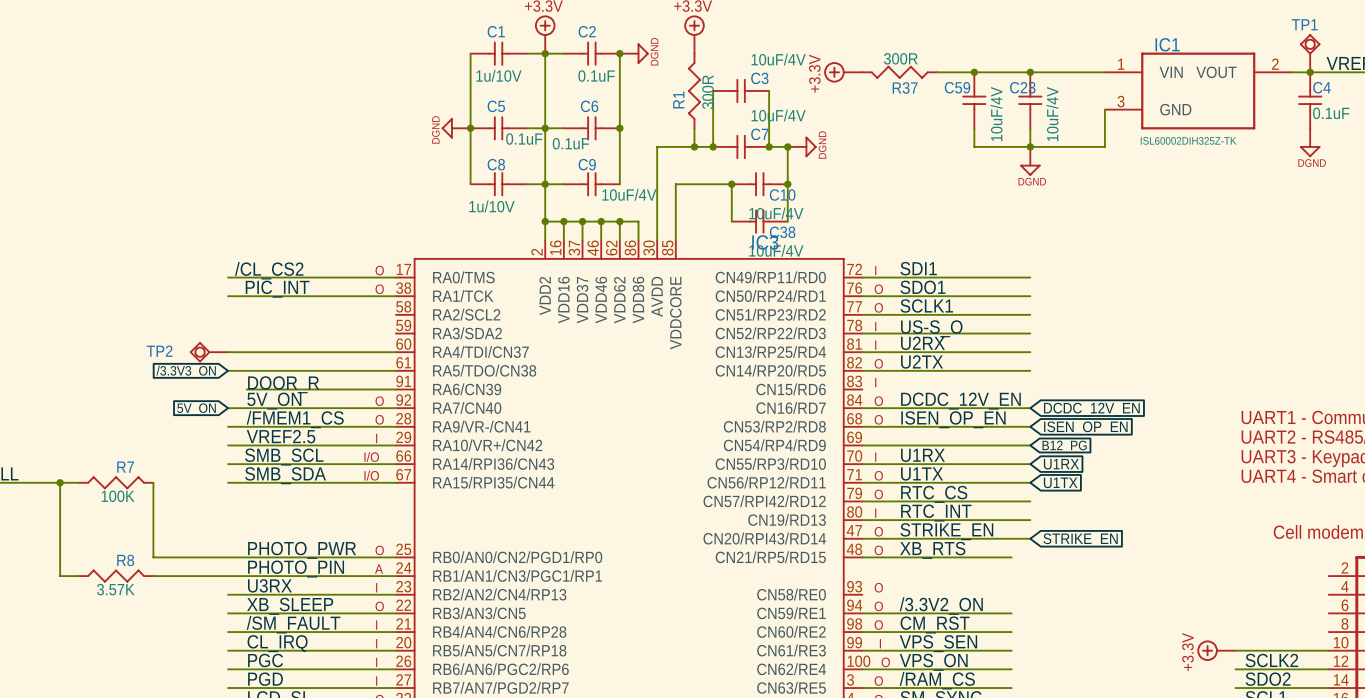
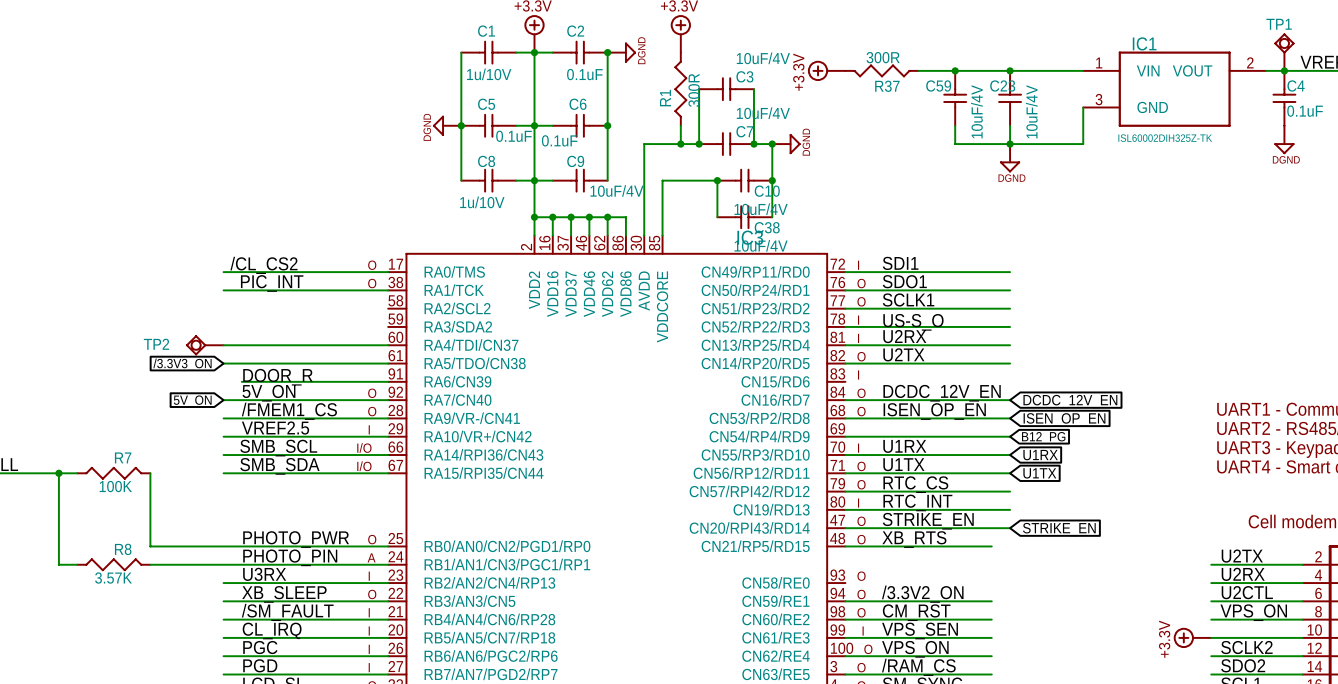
label: none -> U2TX (1242, 556)
wire: none -> (1211, 564) (1302, 564)
label: none -> U2RX (1243, 574)
wire: none -> (1211, 583) (1302, 583)
label: none -> U2CTL (1247, 592)
wire: none -> (1211, 601) (1302, 601)
label: none -> VPS_ON (1253, 612)
wire: none -> (1211, 619) (1302, 619)

